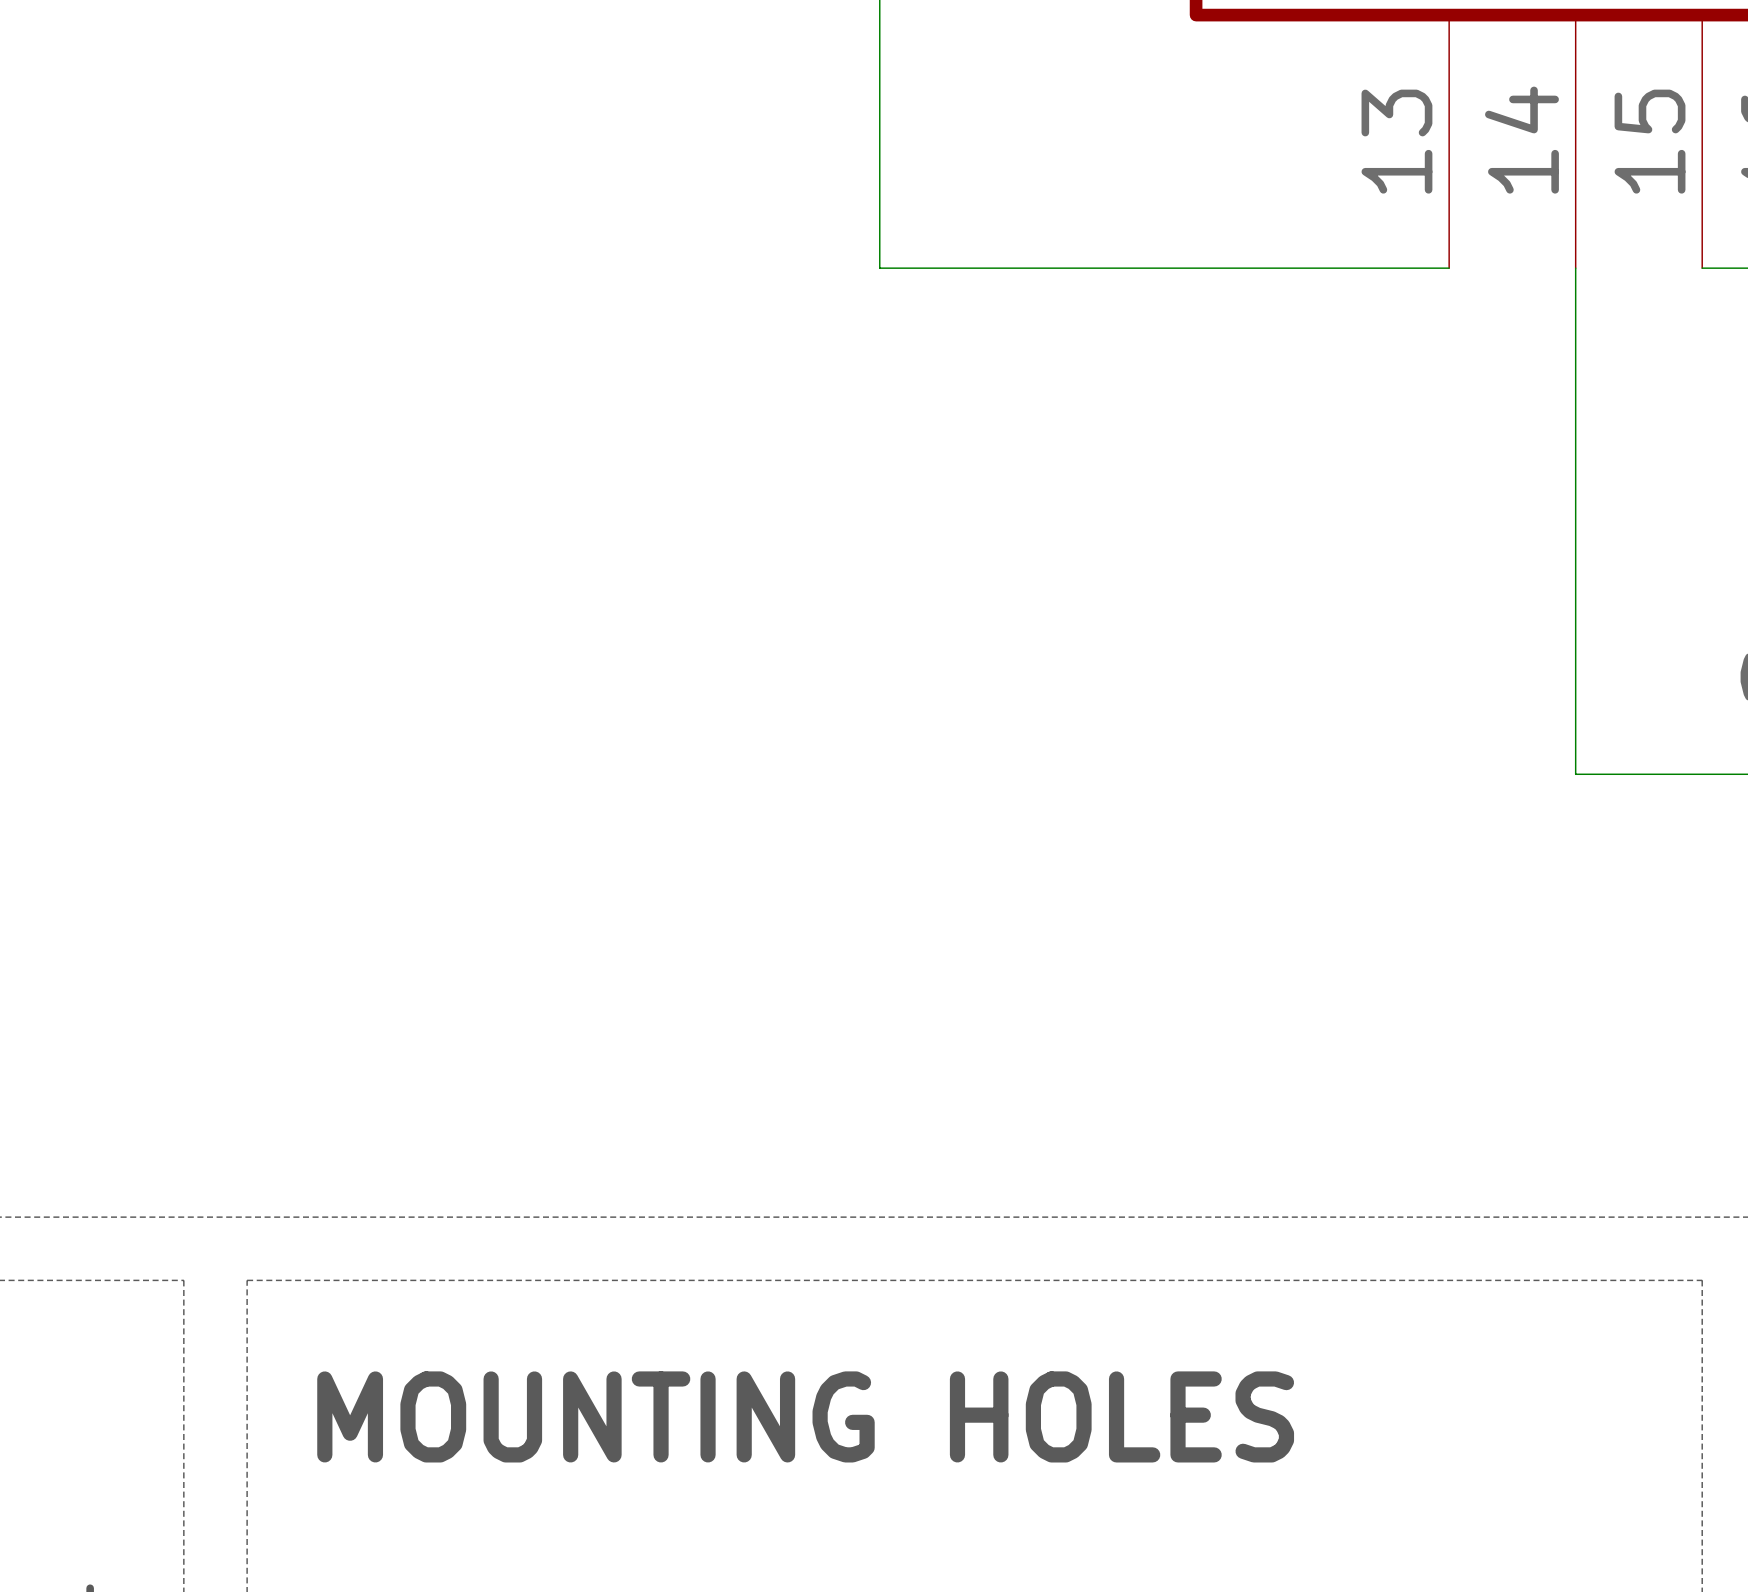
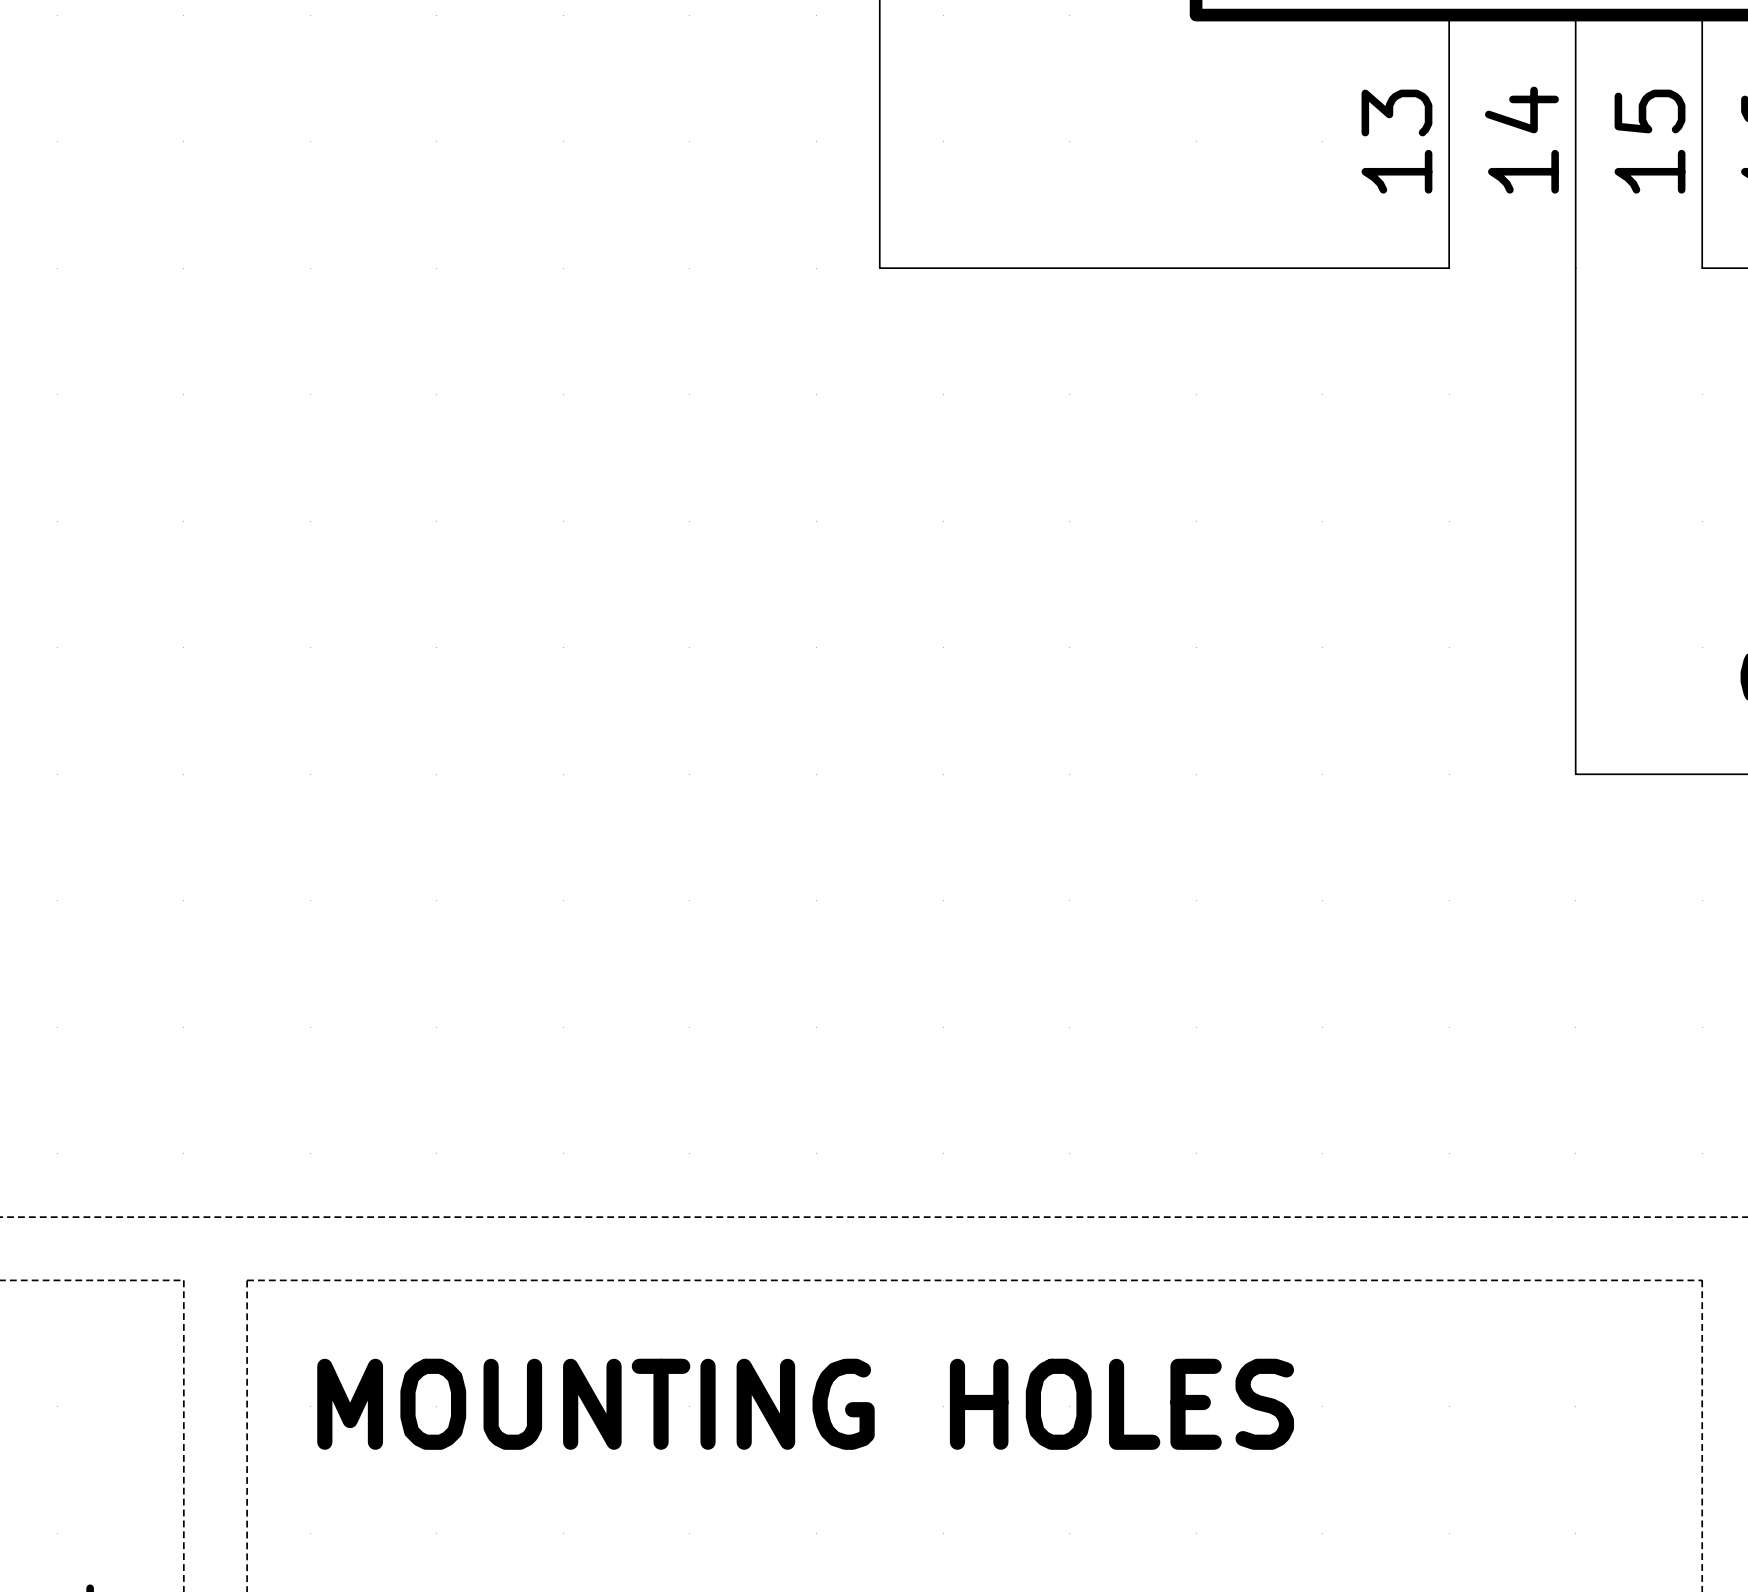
text position: MOUNTING HOLES (805, 1416) -> MOUNTING HOLES (805, 1404)

